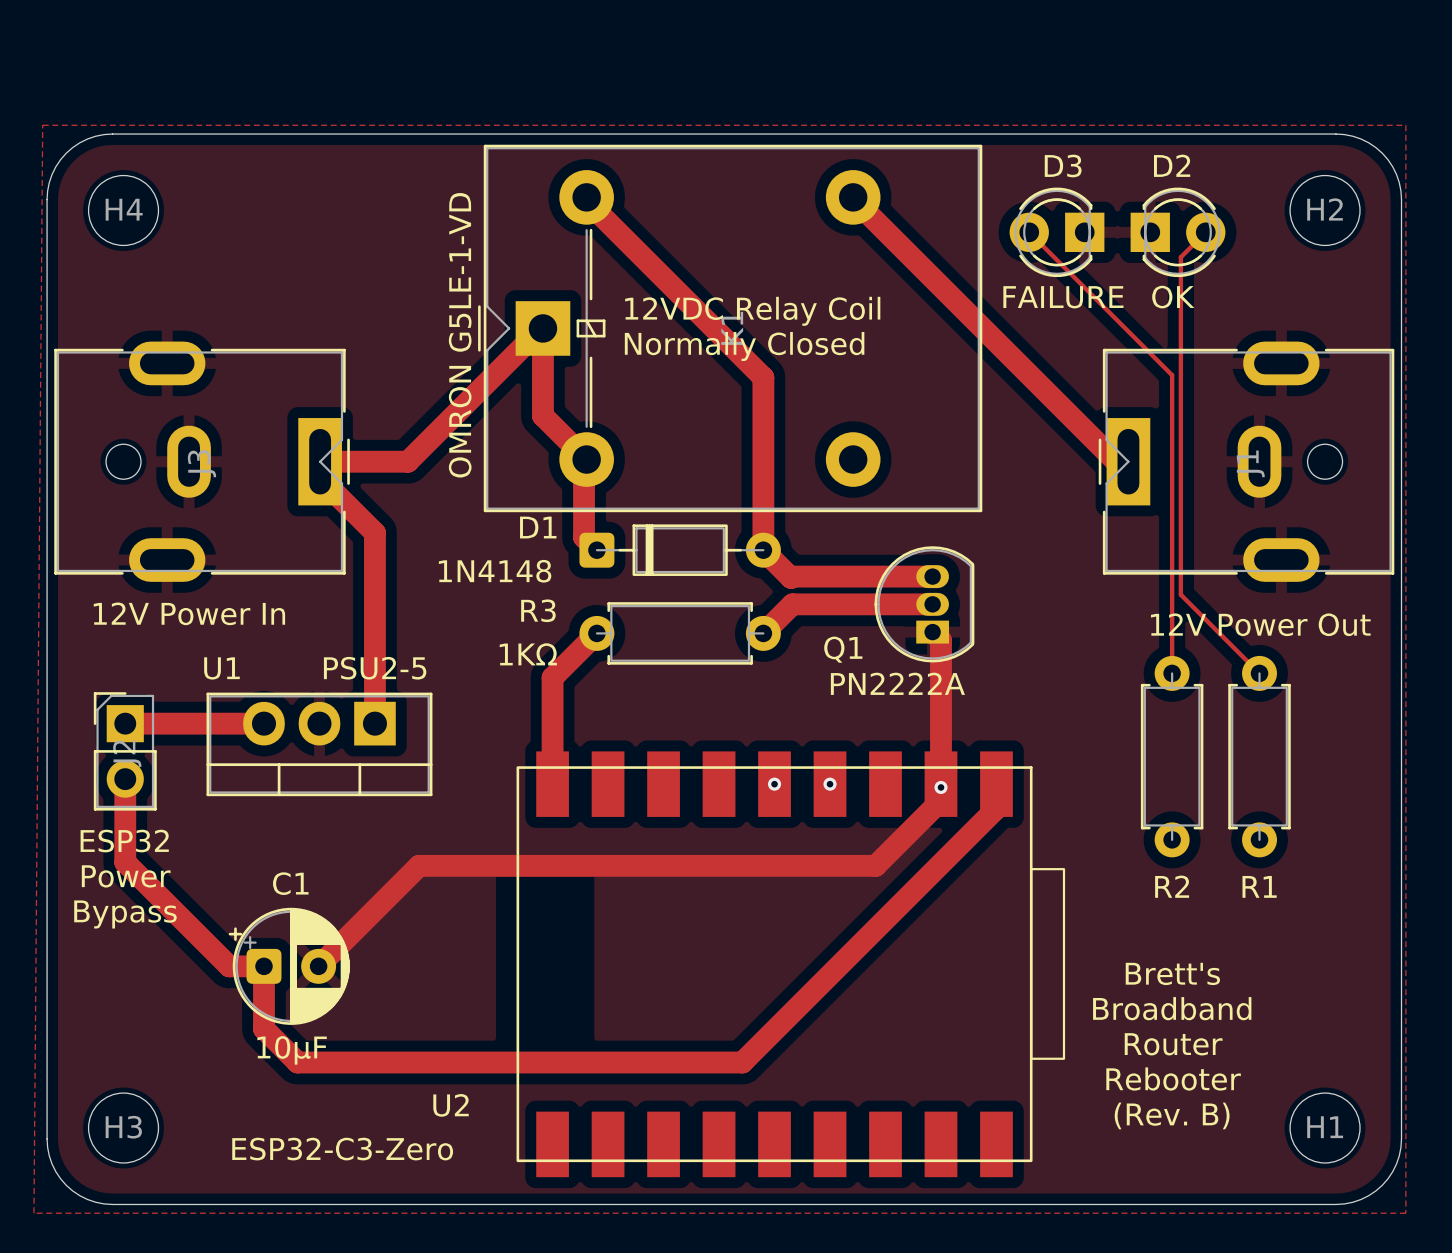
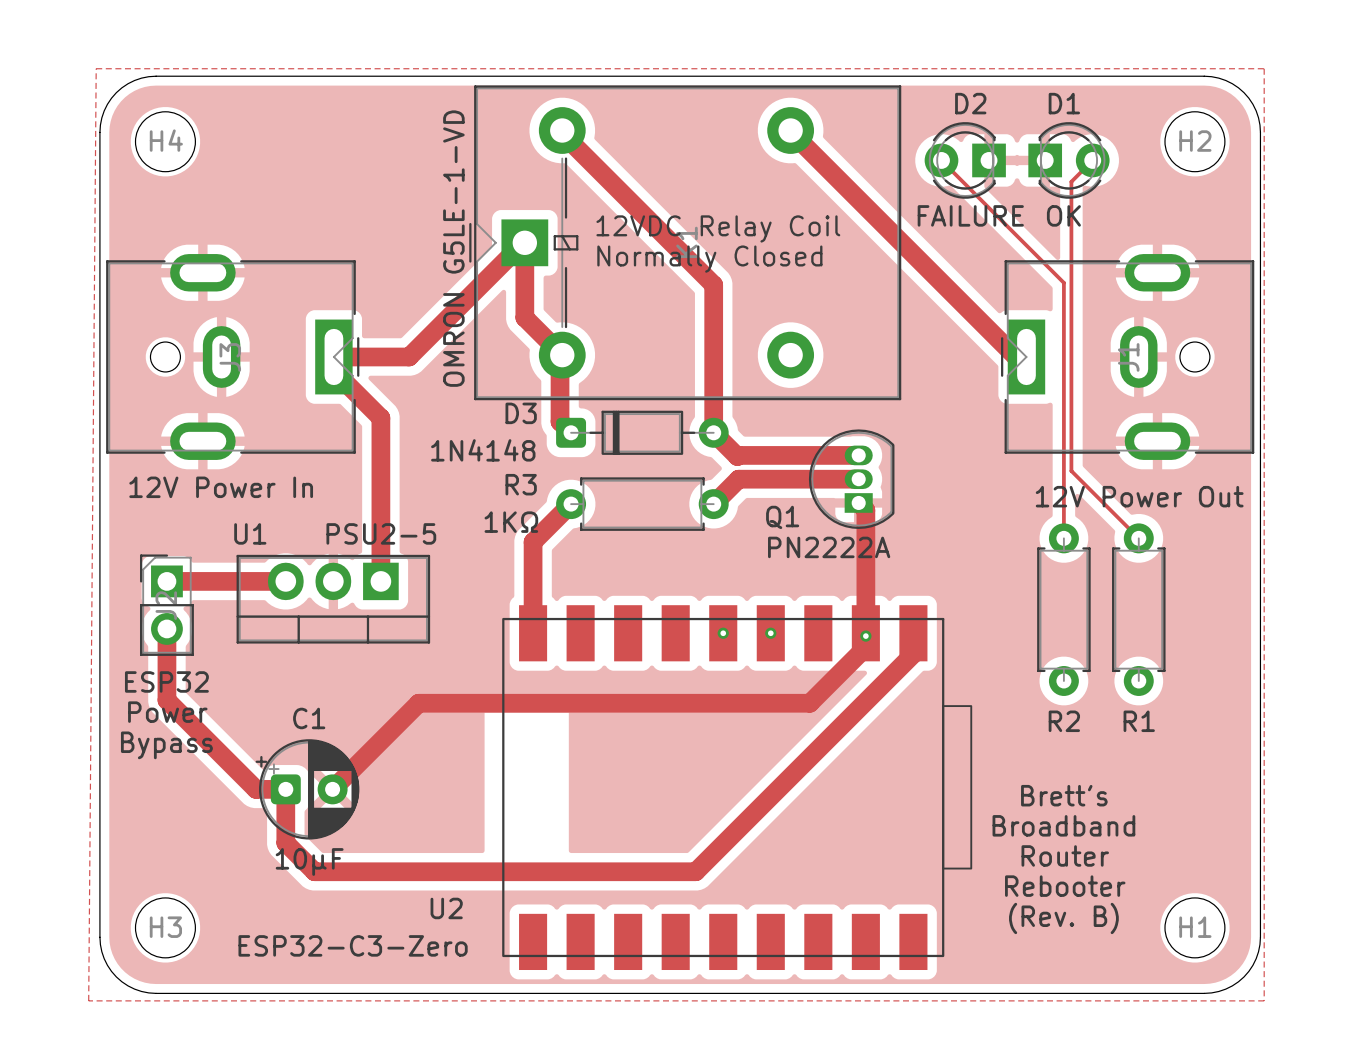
D2 name: D2 (1172, 165) -> D1 (1064, 103)
D3 name: D3 (1063, 166) -> D2 (970, 103)
D1 name: D1 (538, 527) -> D3 (521, 413)

